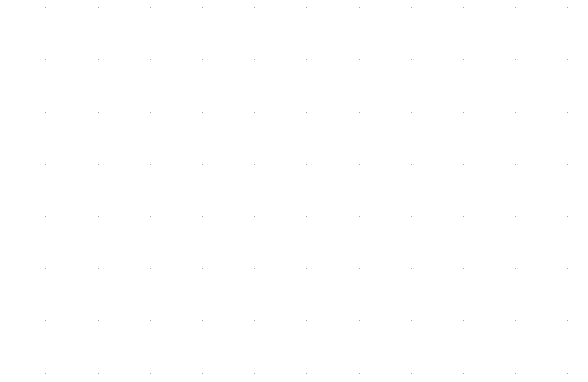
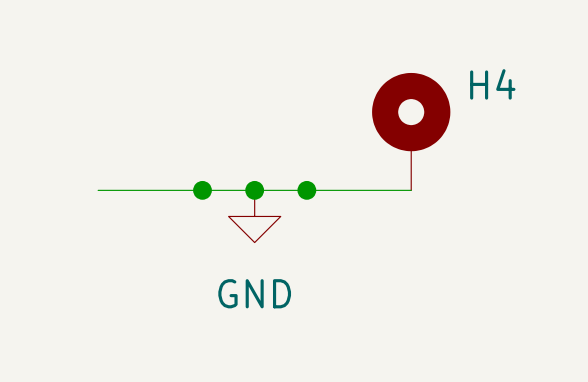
H4: none -> (411, 131)
wire: none -> (98, 190) (411, 190)
junction: none -> (202, 190)
junction: none -> (254, 190)
junction: none -> (306, 190)
power symbol: none -> GND (254, 216)

